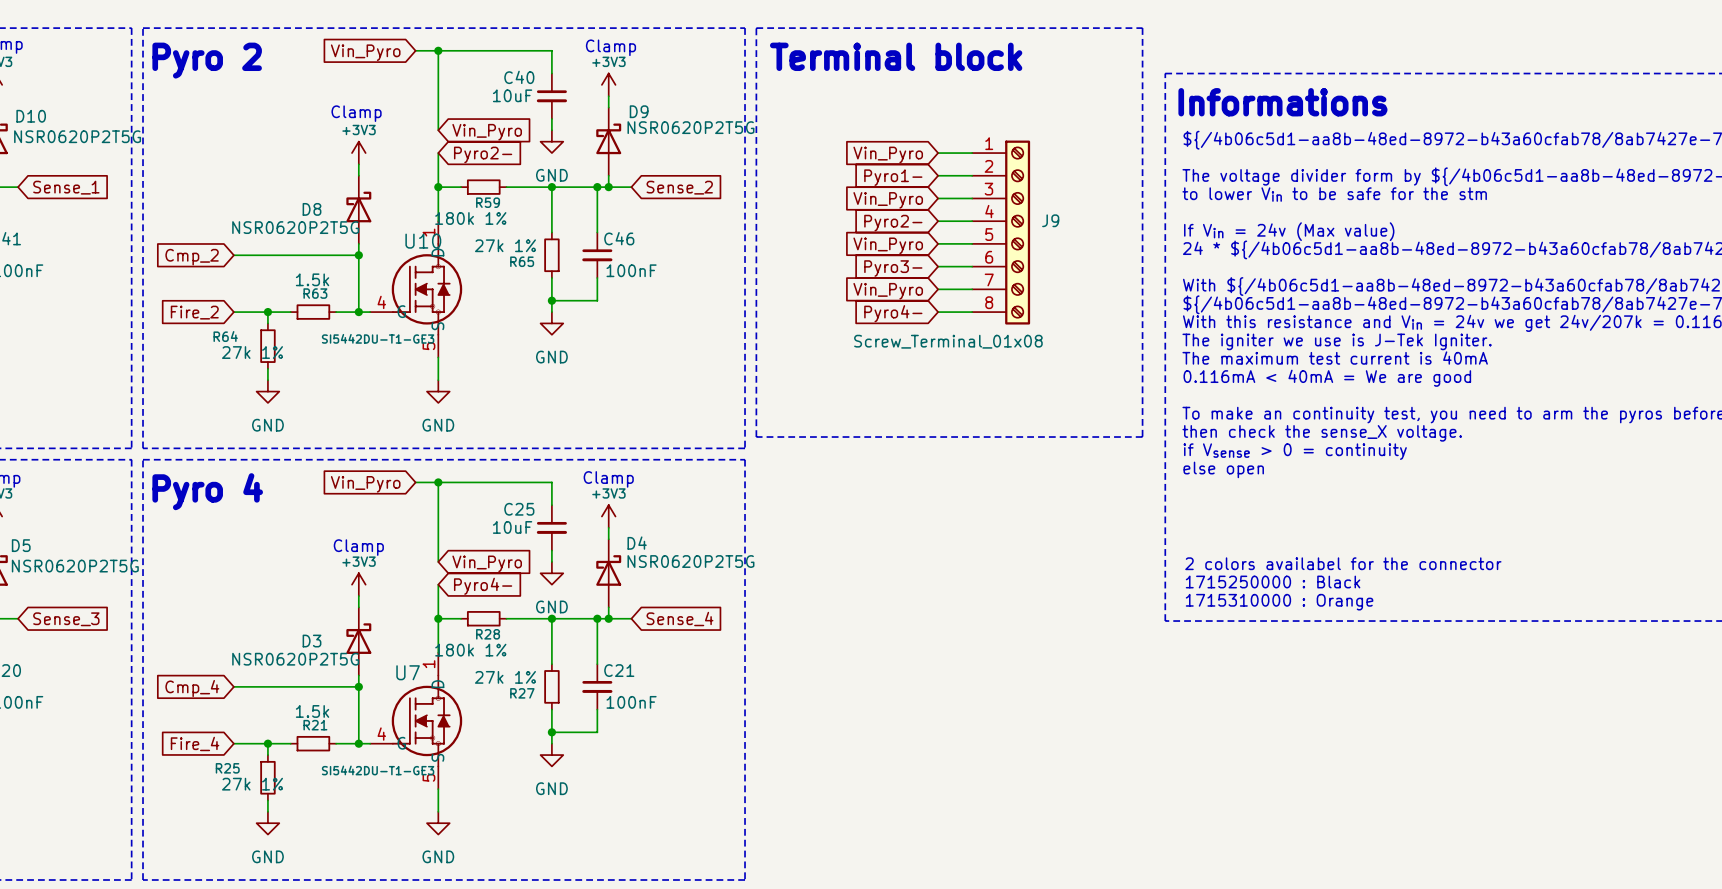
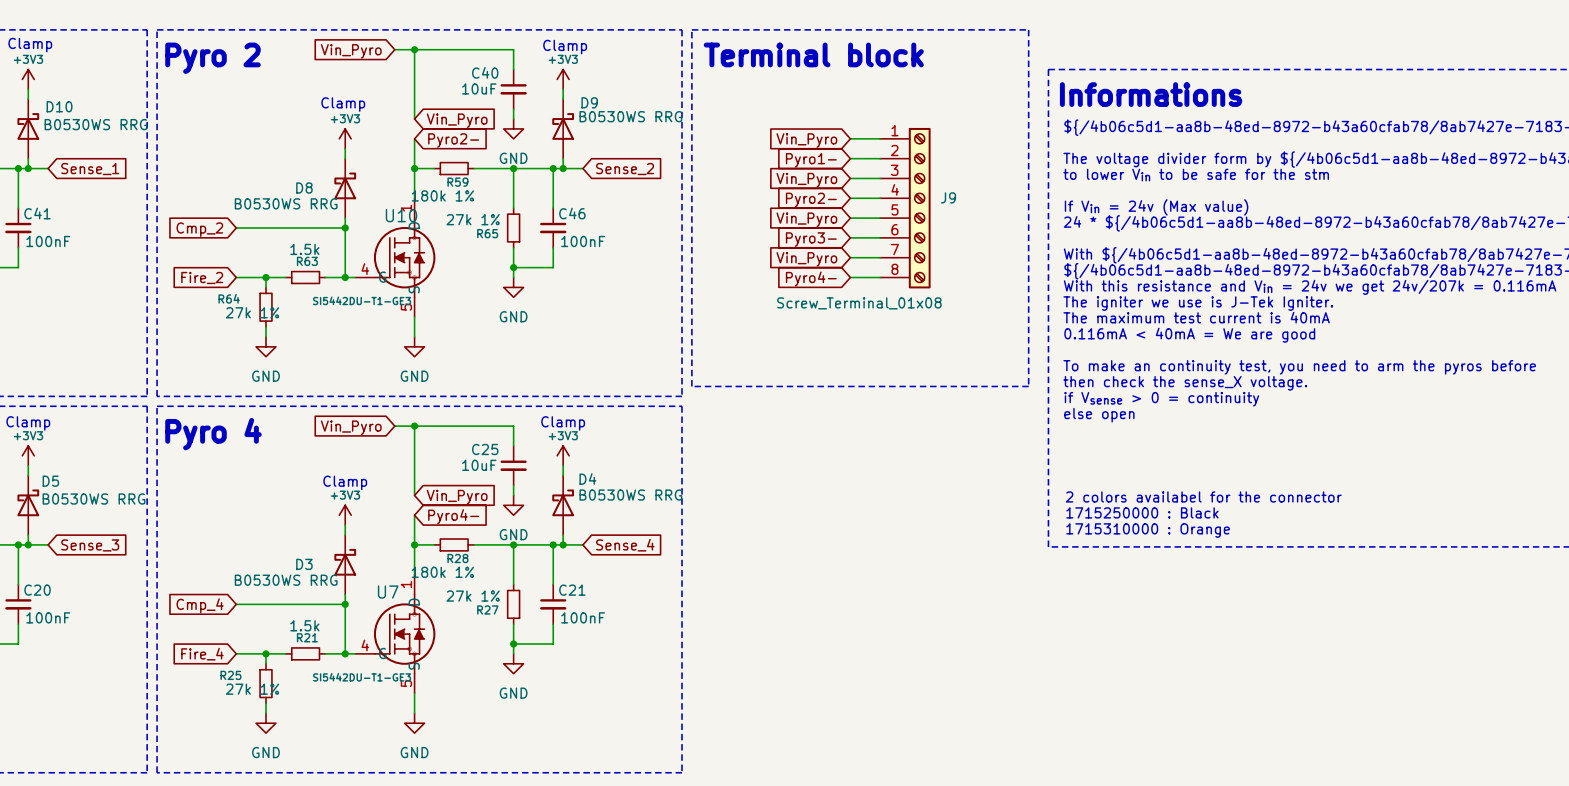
D9 value: NSR0620P2T5G (690, 127) -> B0530WS RRG (630, 116)
D10 value: NSR0620P2T5G (77, 136) -> B0530WS RRG (96, 124)
D8 value: NSR0620P2T5G (295, 227) -> B0530WS RRG (286, 203)
D4 value: NSR0620P2T5G (690, 561) -> B0530WS RRG (630, 495)
D5 value: NSR0620P2T5G (75, 566) -> B0530WS RRG (94, 499)
D3 value: NSR0620P2T5G (295, 659) -> B0530WS RRG (286, 580)

